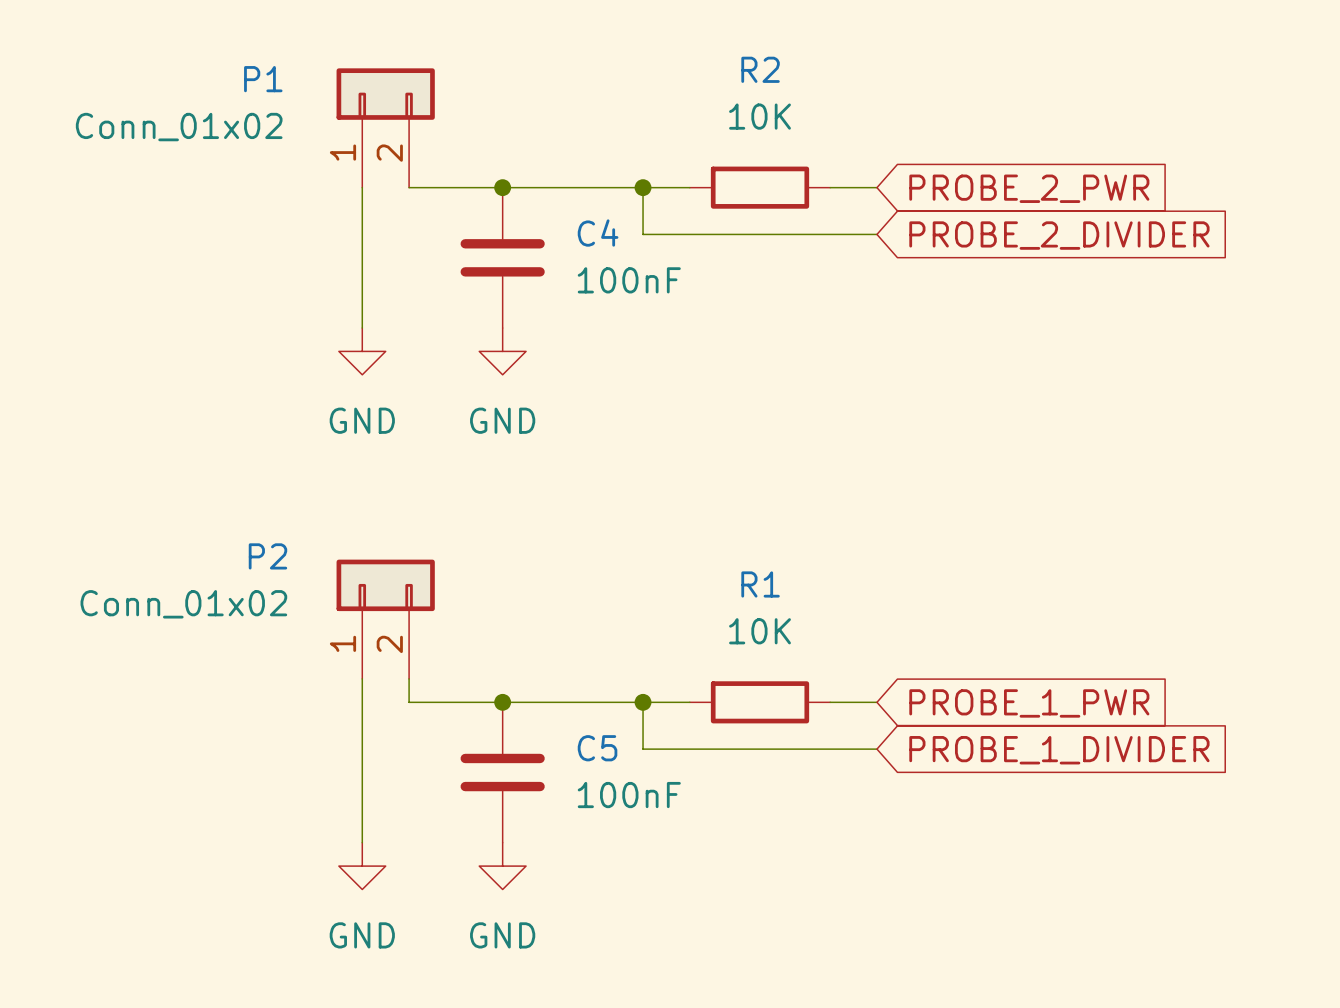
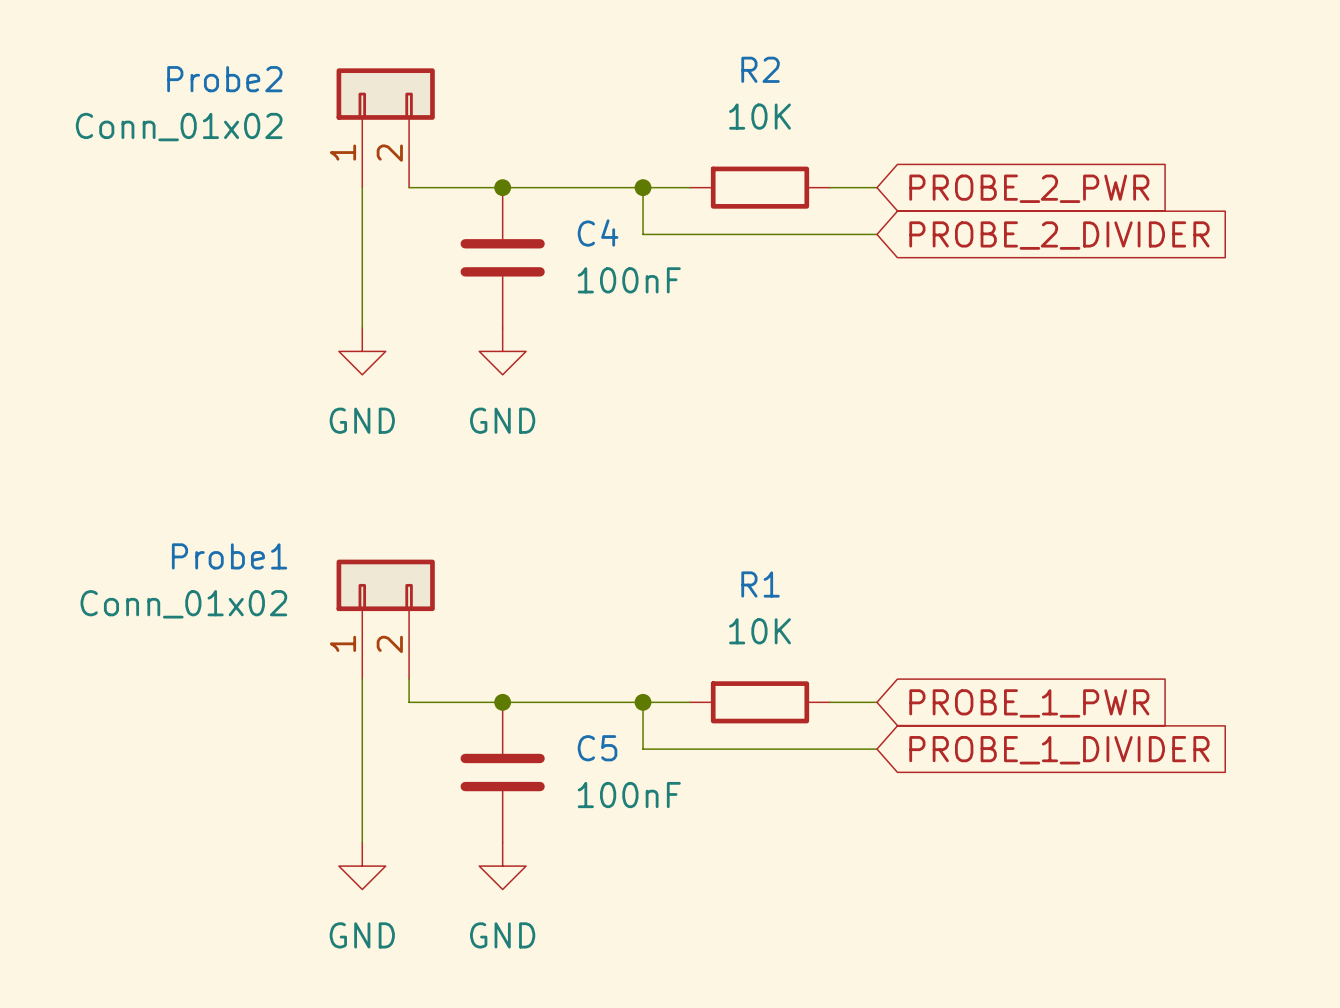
P1 name: P1 (263, 79) -> Probe2 (224, 79)
P2 name: P2 (267, 556) -> Probe1 (229, 556)

